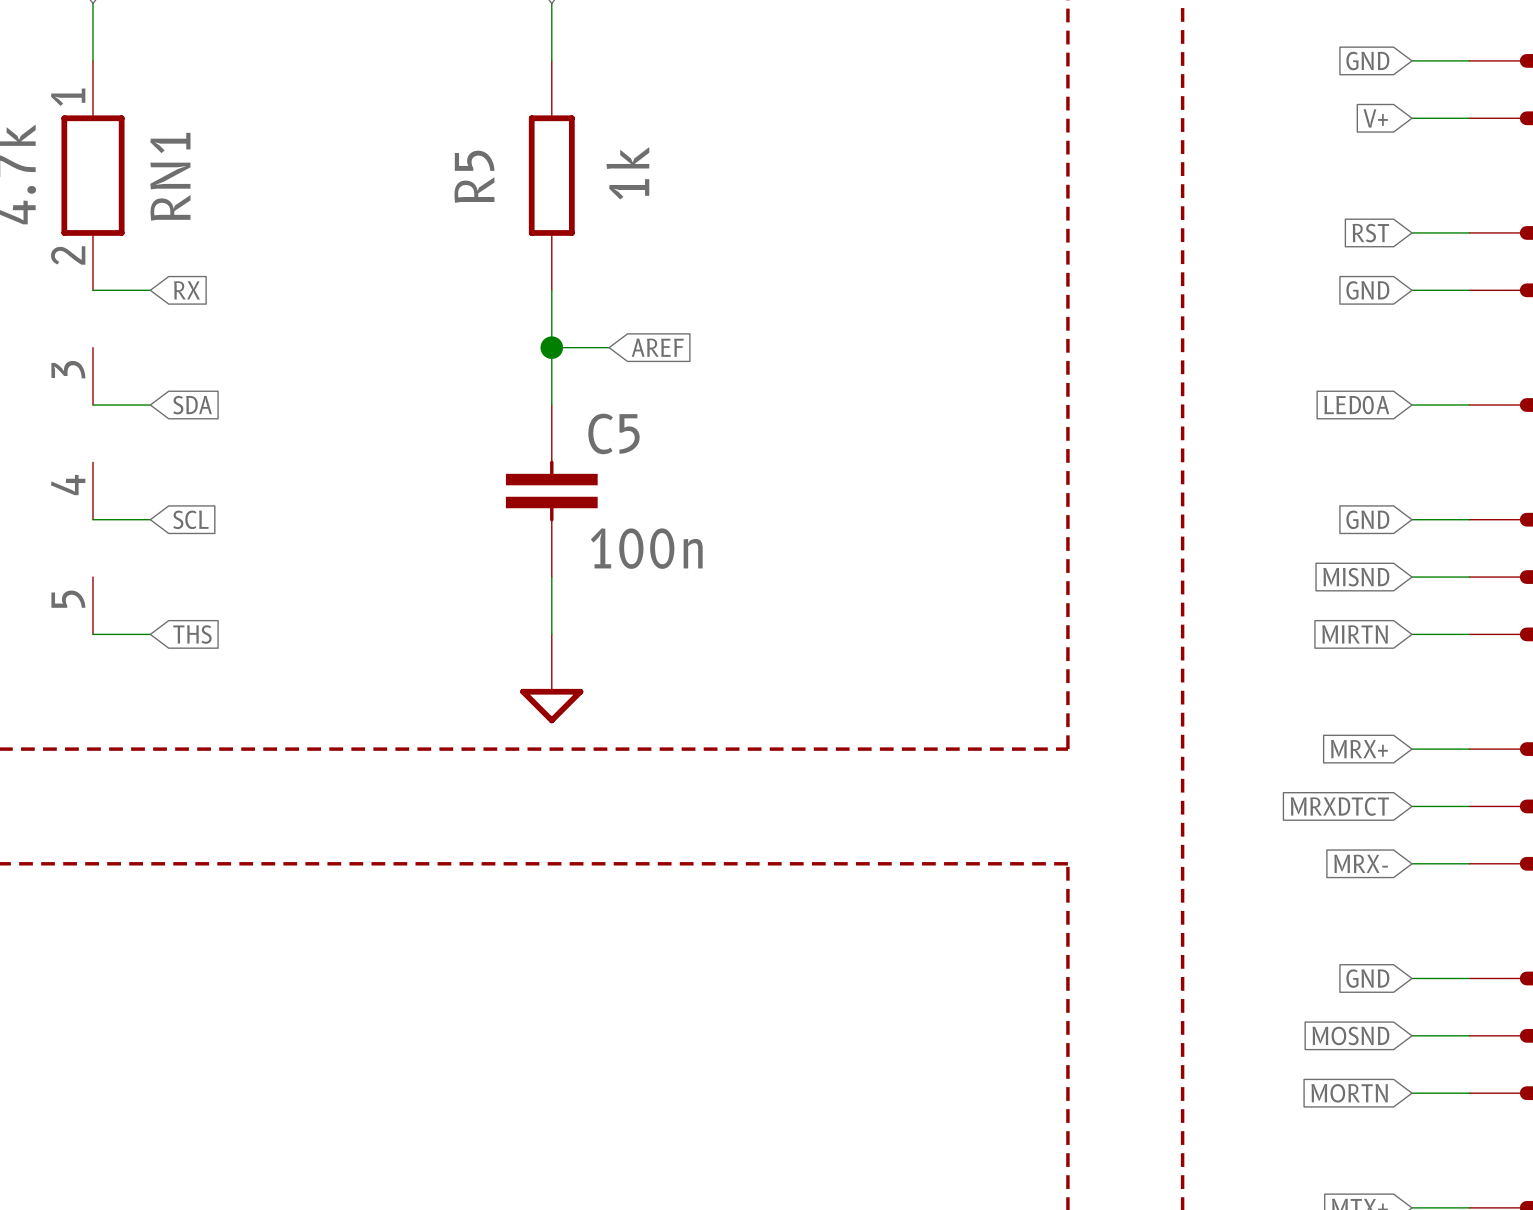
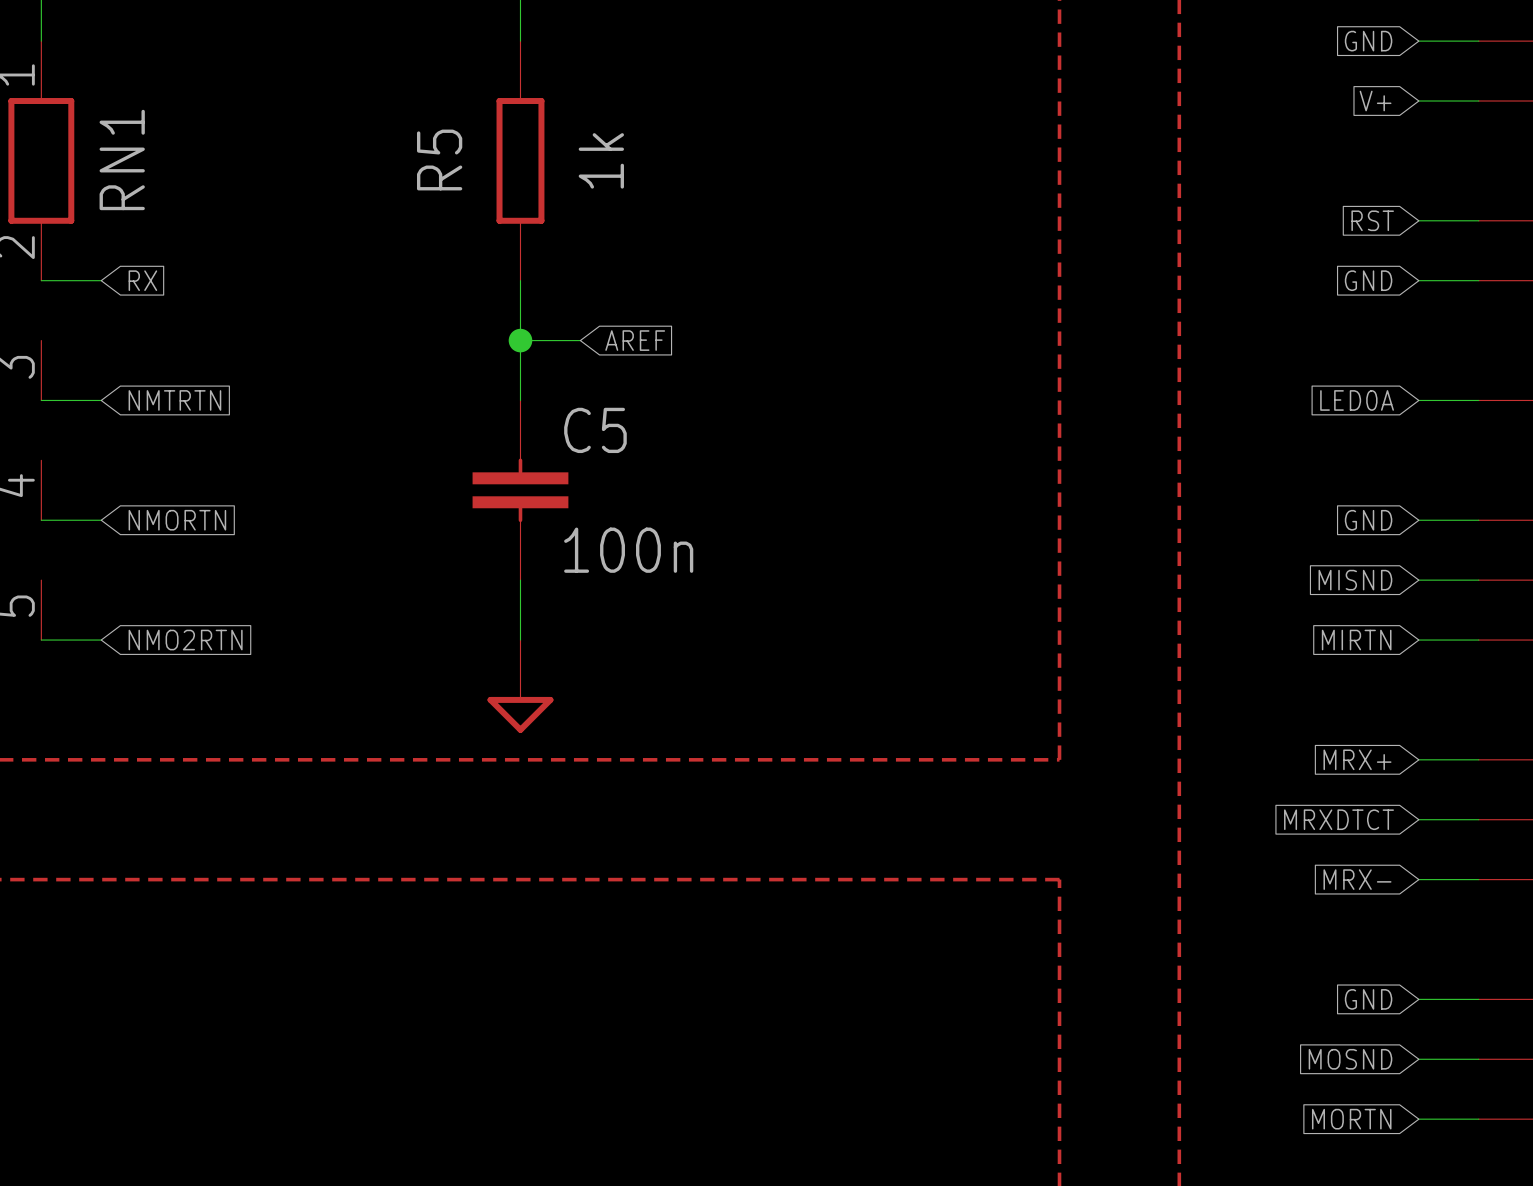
global label: SDA (192, 405) -> NMTRTN (174, 400)
global label: SCL (190, 519) -> NMORTN (177, 520)
global label: THS (192, 634) -> NMO2RTN (185, 640)

